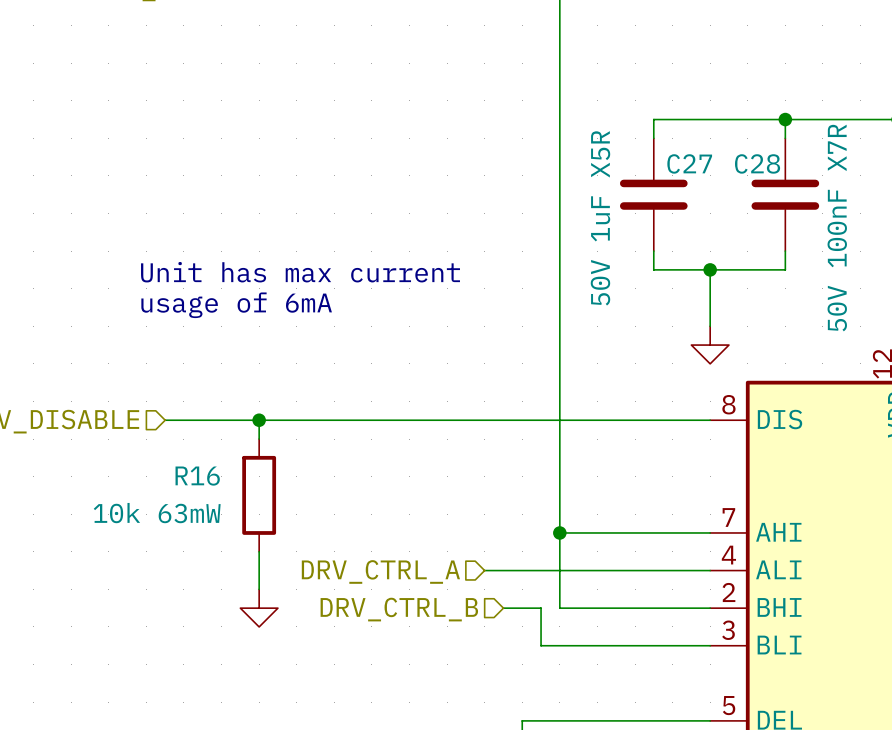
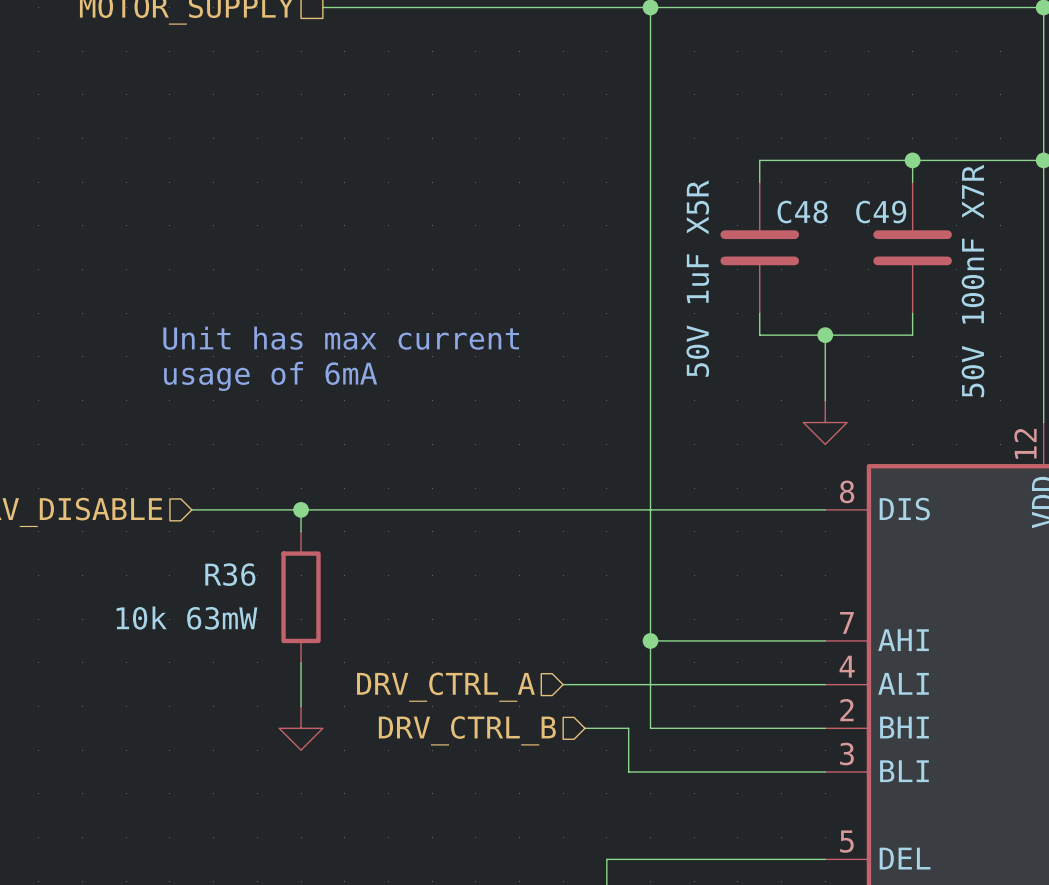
C27 name: C27 (689, 163) -> C48 (802, 212)
C28 name: C28 (757, 163) -> C49 (881, 212)
R16 name: R16 (197, 476) -> R36 (230, 574)

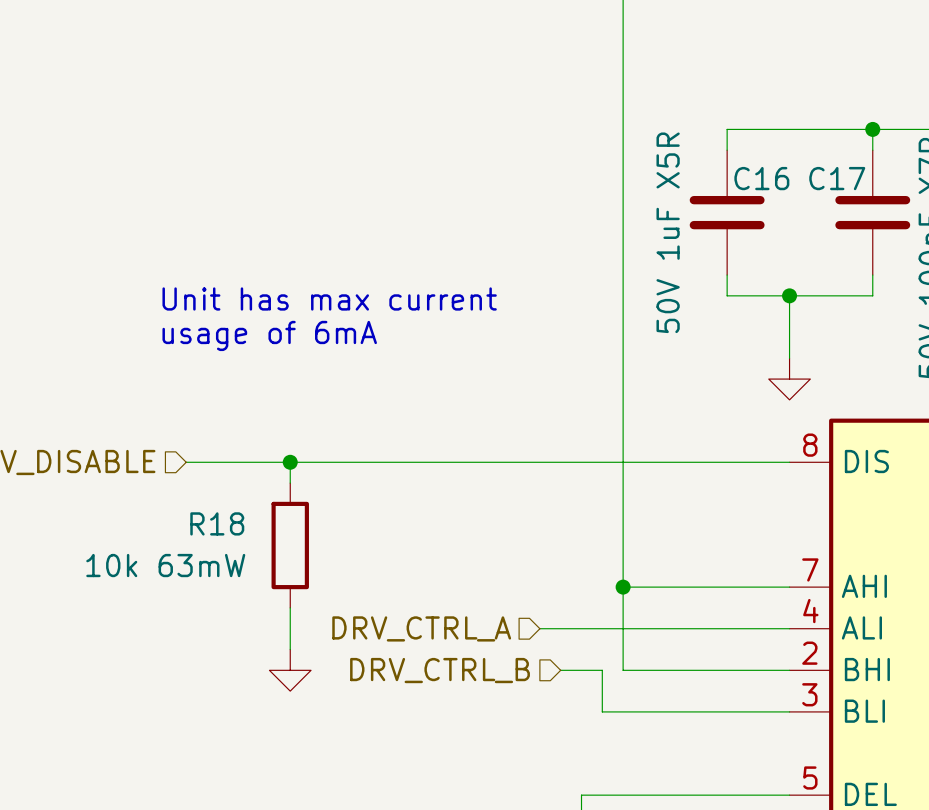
C48 name: C48 (802, 212) -> C16 (761, 178)
C49 name: C49 (881, 212) -> C17 (837, 178)
R36 name: R36 (230, 574) -> R18 (217, 523)

